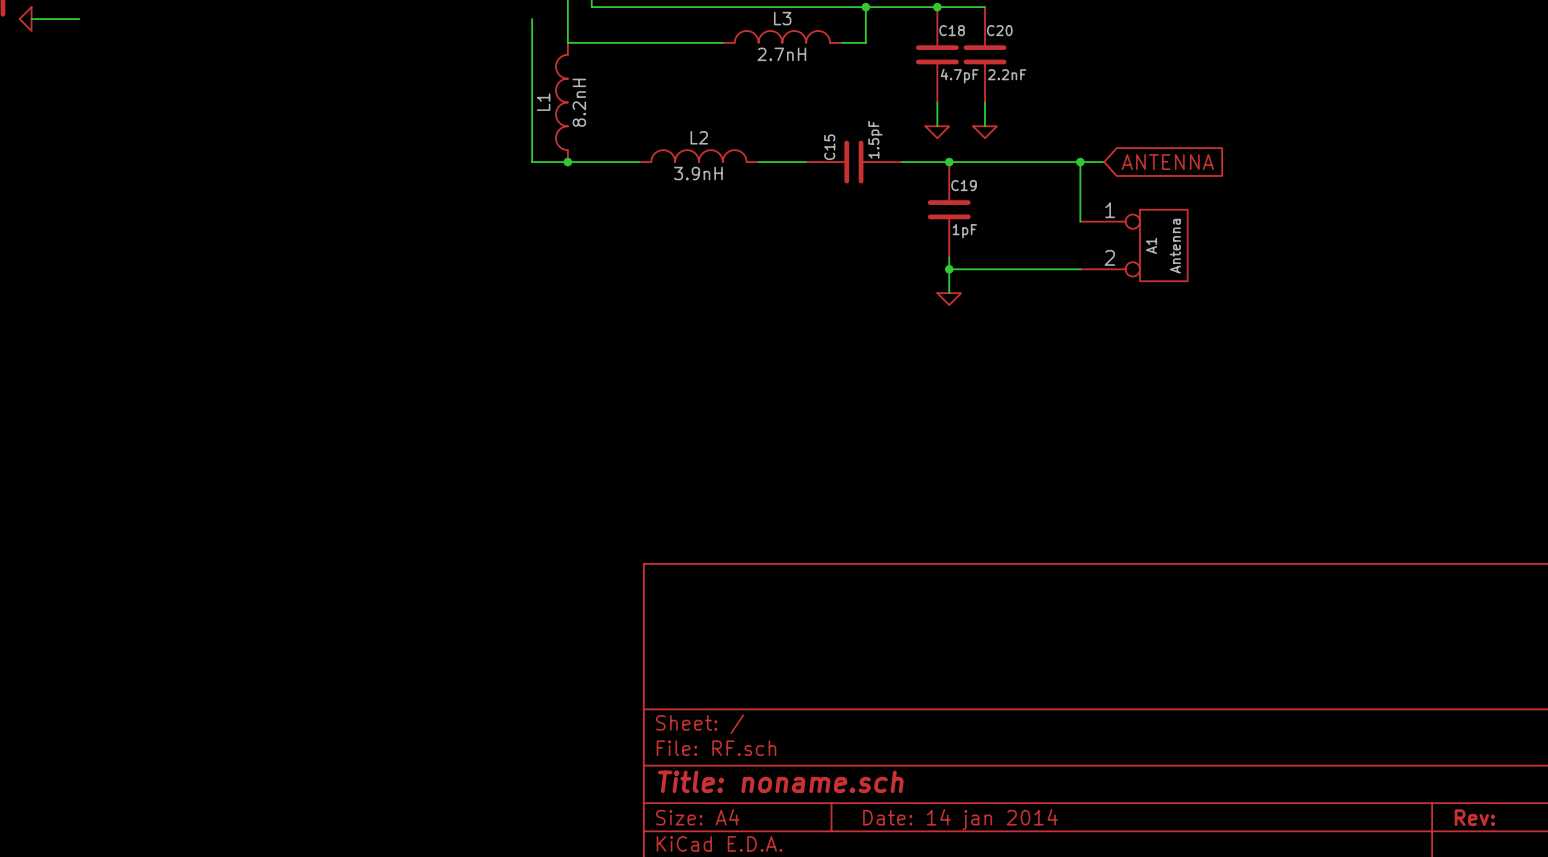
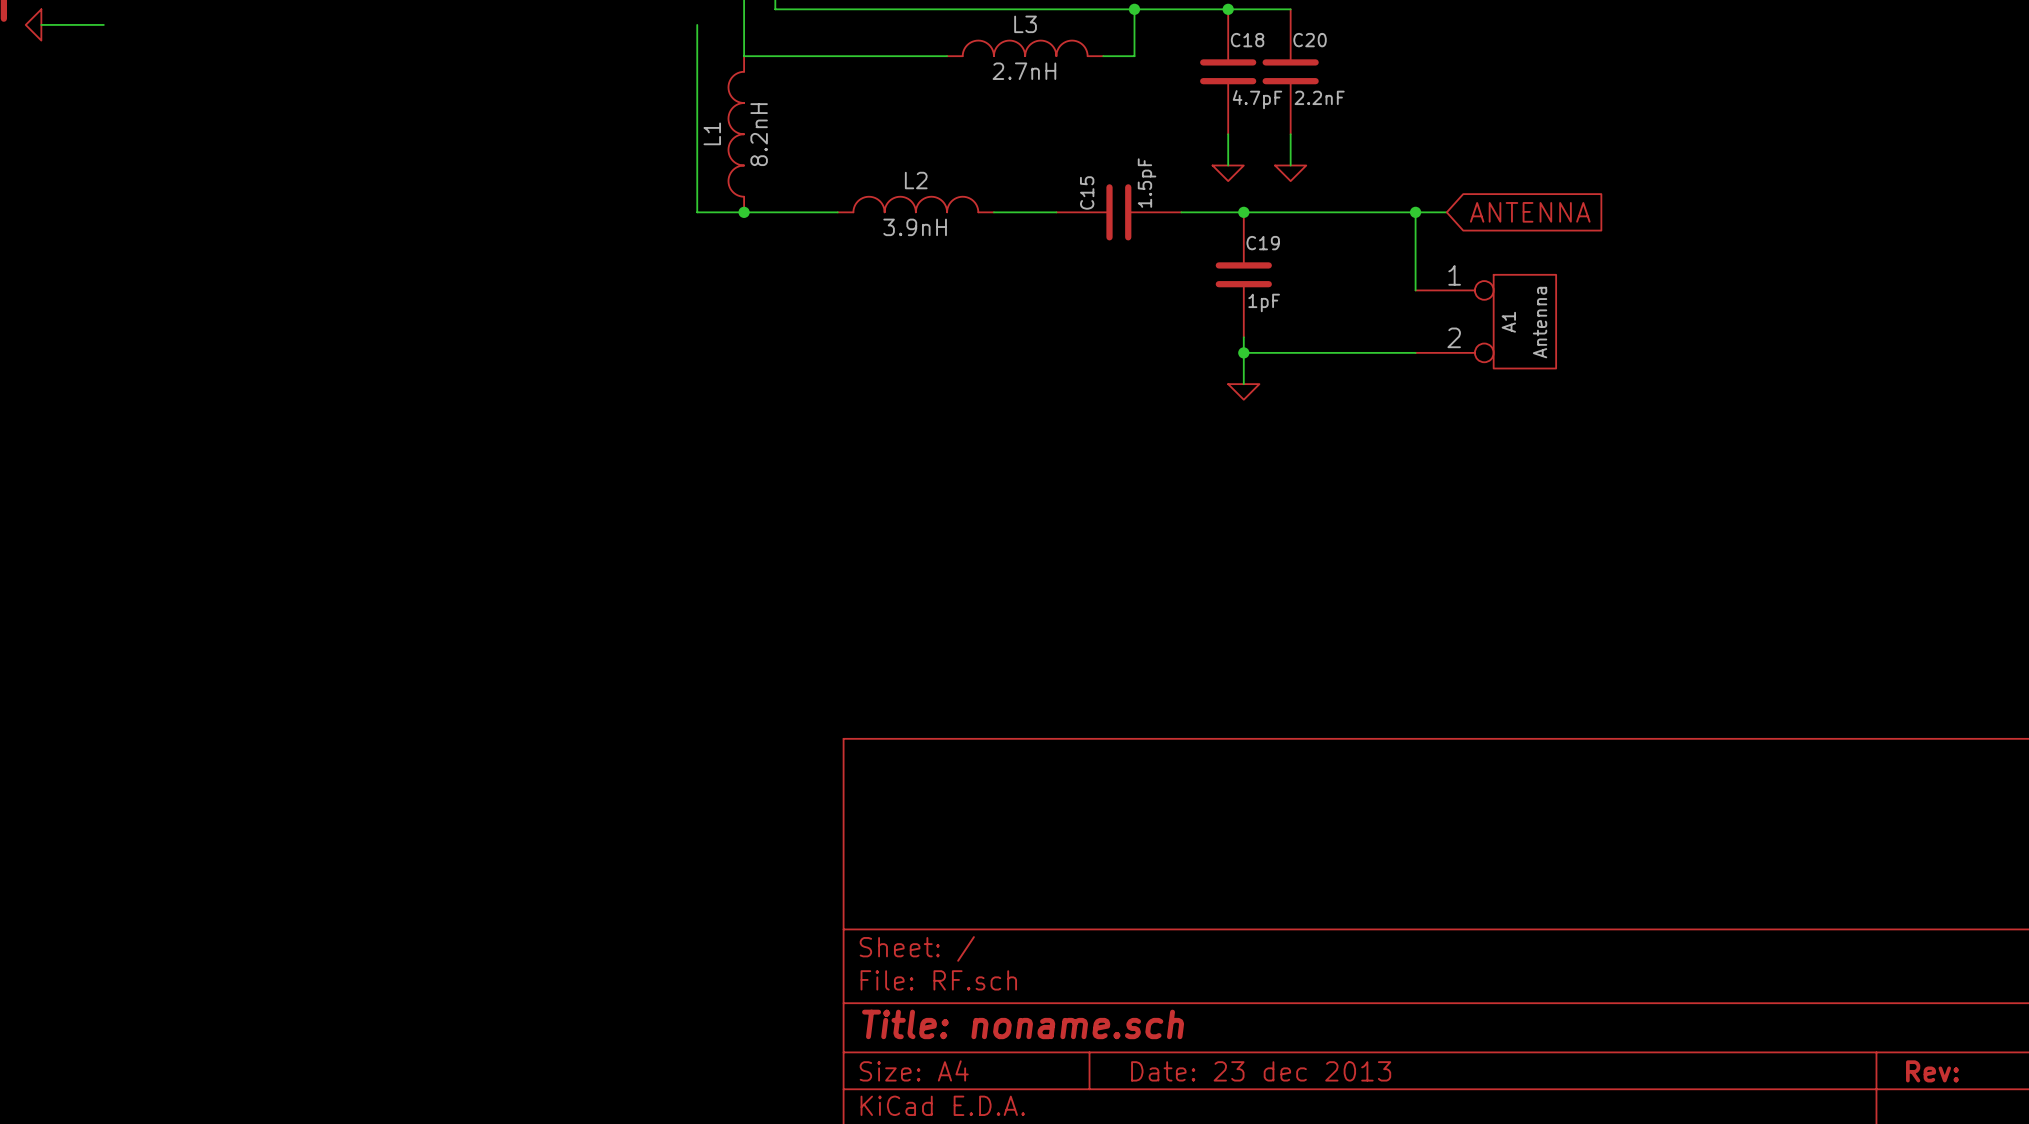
title block: Date: 14 jan 2014 (960, 819) -> Date: 23 dec 2013 (1261, 1071)

